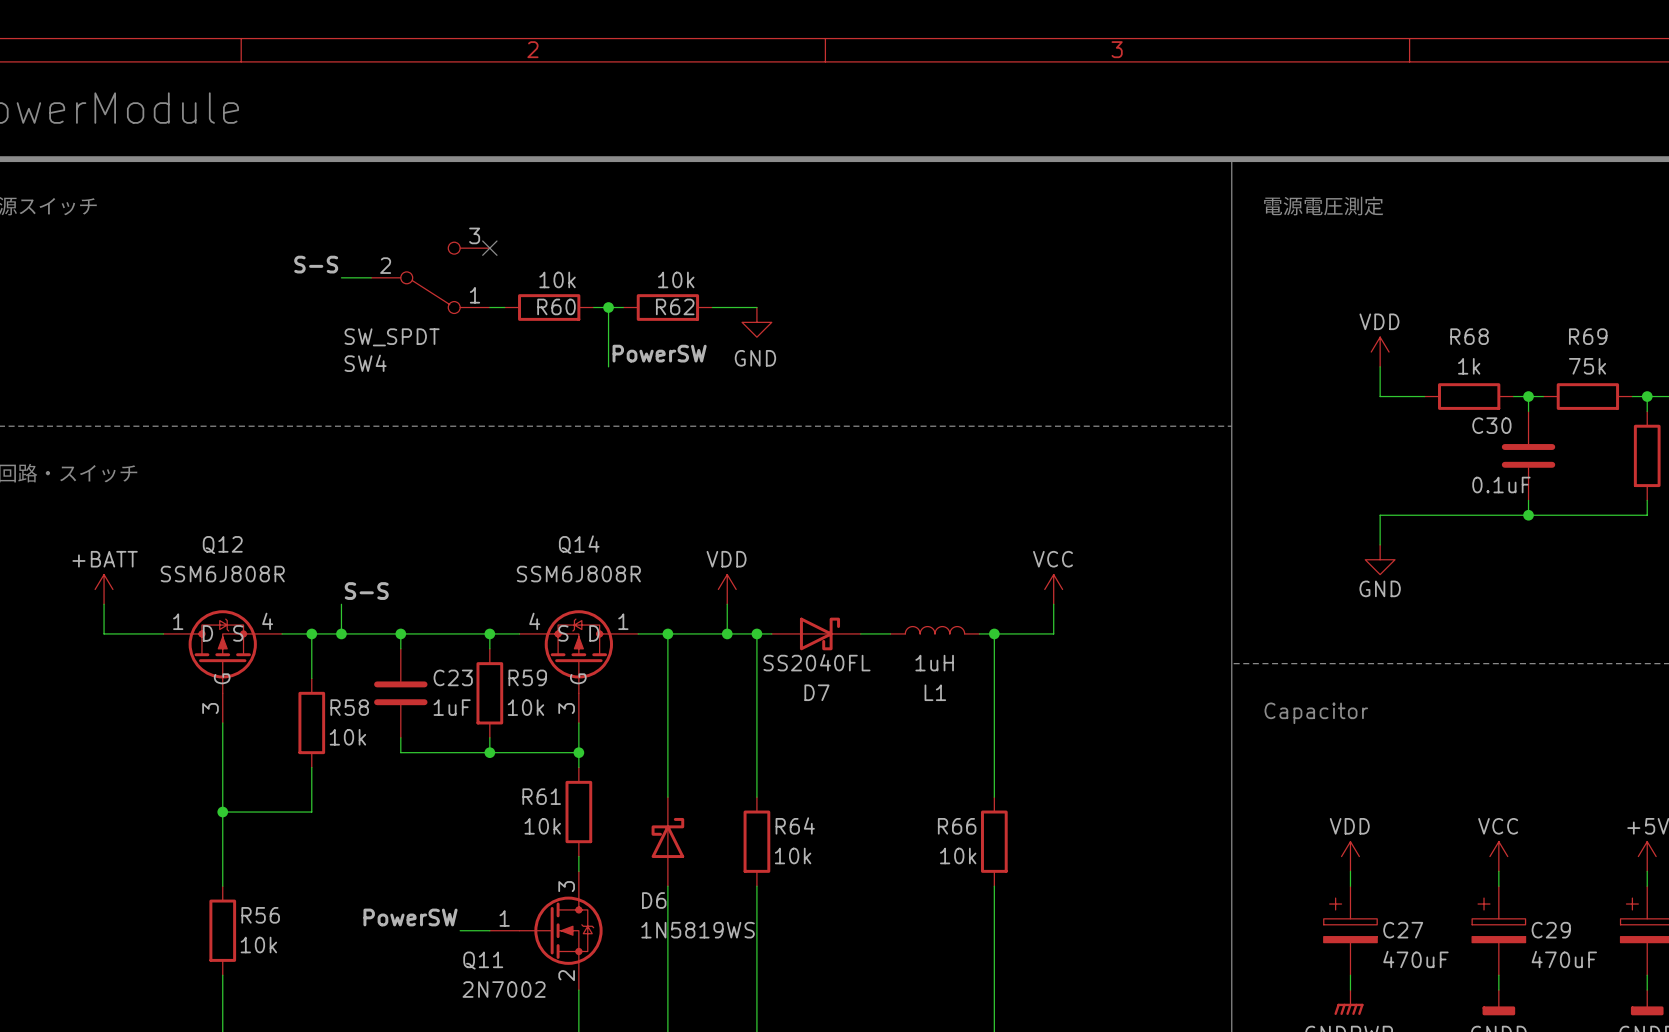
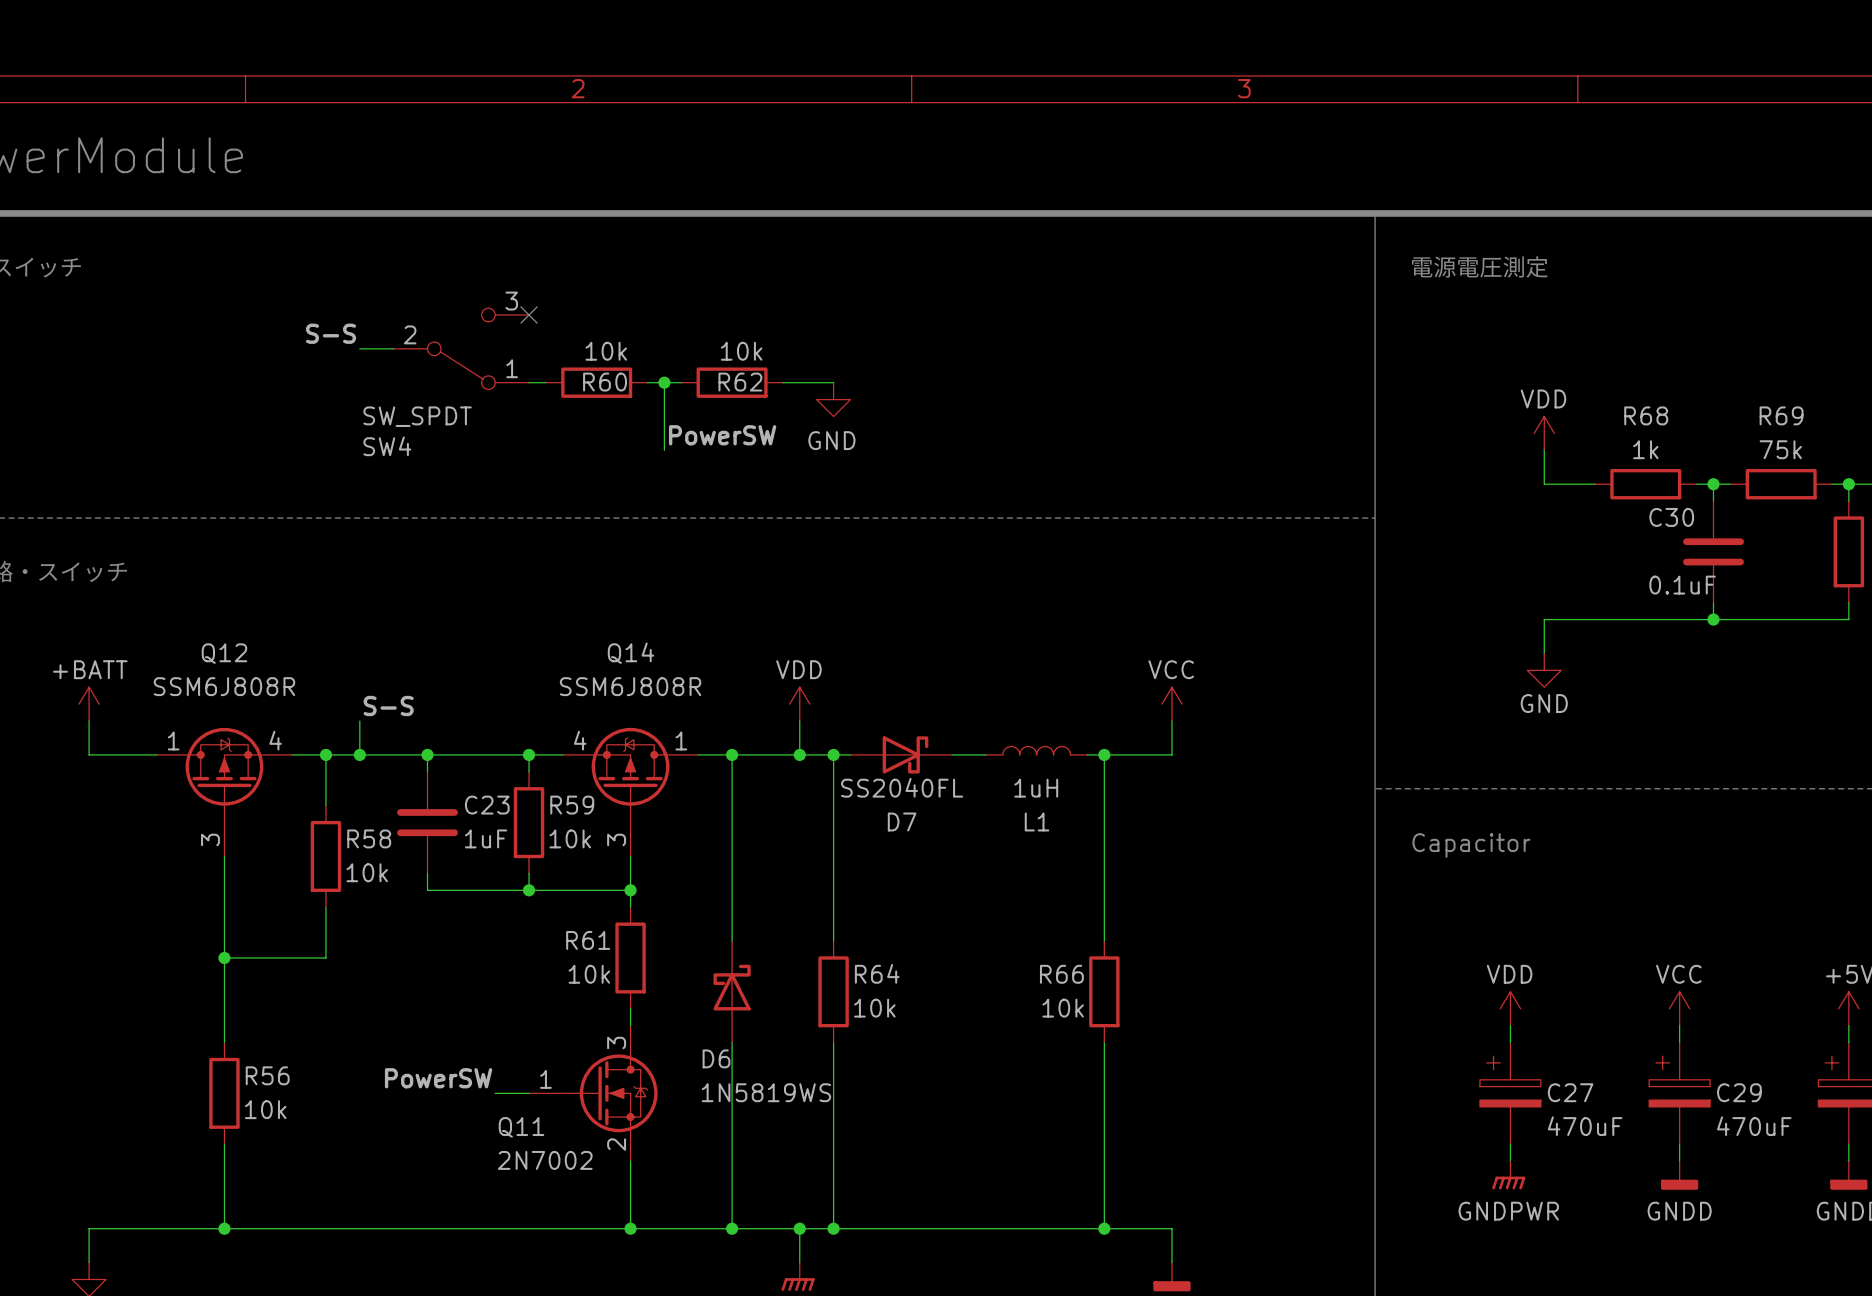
Q12 pin name: D (207, 633) -> none
Q12 pin name: S (238, 633) -> none
Q14 pin name: S (563, 633) -> none
Q14 pin name: D (594, 633) -> none
Q12 pin name: G (222, 678) -> none
Q14 pin name: G (578, 678) -> none

